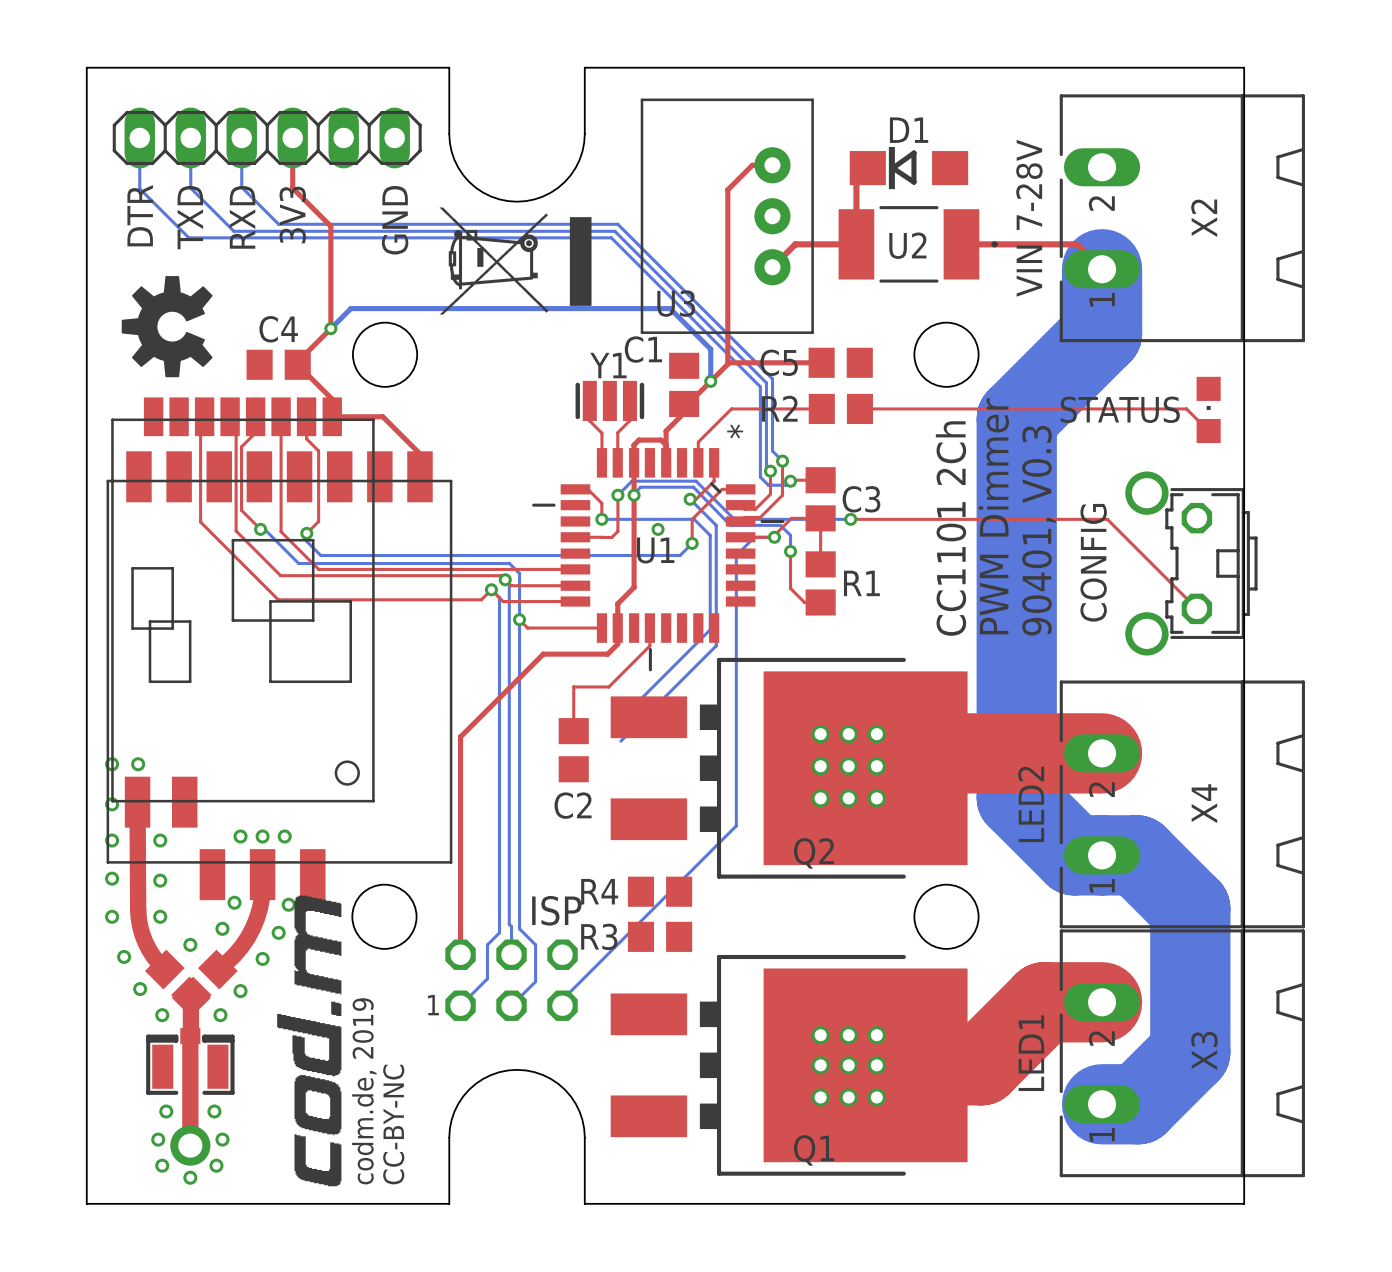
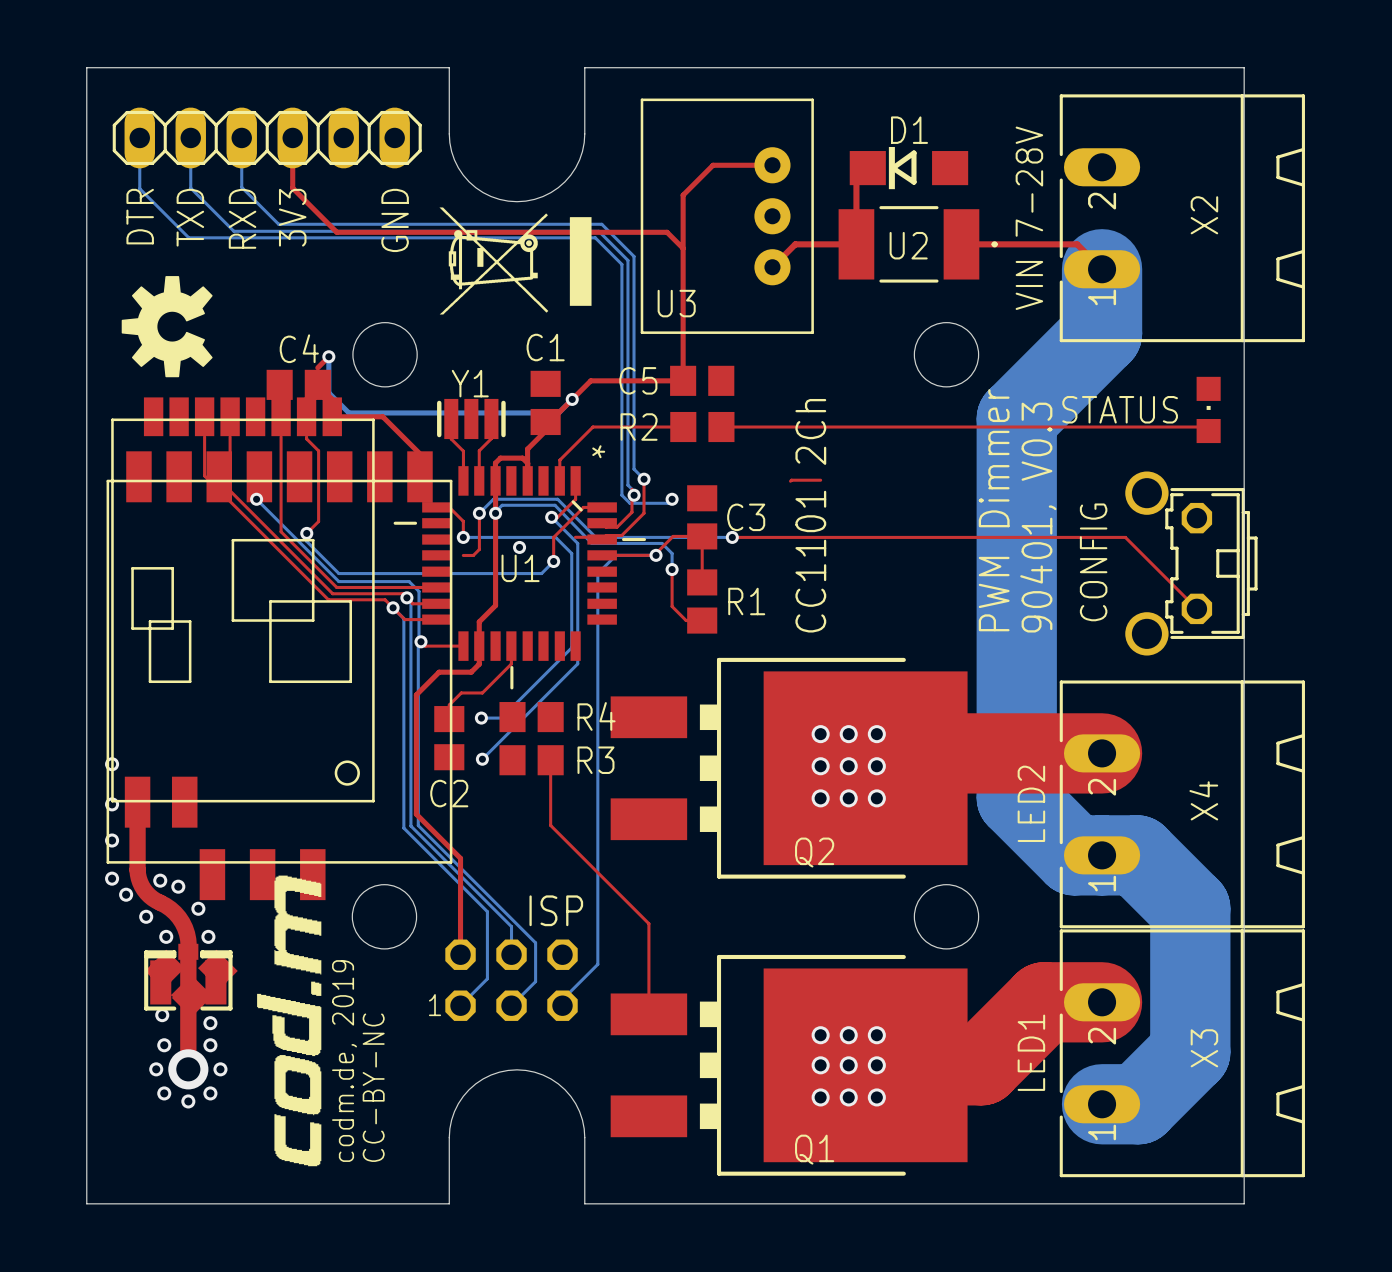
top track: (752, 165) (727, 189) (727, 364) -> (752, 165) (713, 165) (683, 195) (683, 380) (590, 380) (549, 422) (545, 422) (545, 431) (527, 449) (527, 471)
bottom track: (601, 224) (617, 224) (772, 378) (772, 451) (782, 461) -> (601, 224) (634, 256) (634, 469) (644, 479)
top track: (330, 226) (330, 328) (297, 361) (297, 364) (317, 384) -> (330, 226) (336, 232) (667, 232) (683, 248)
bottom track: (598, 231) (614, 231) (766, 382) (766, 467) (770, 471) -> (598, 231) (627, 260) (627, 485) (631, 489)
bottom track: (595, 237) (611, 237) (760, 386) (760, 477) (768, 485) (786, 485) (790, 481) -> (595, 237) (621, 264) (621, 495) (629, 503) (668, 503) (672, 499)
bottom track: (330, 328) (350, 308) (670, 308) (710, 349) (710, 381) -> none
via position: (330, 328) -> (328, 356)
C1 name position: C1 (643, 349) -> C1 (545, 347)
top track: none -> (328, 356) (317, 367)
bottom track: none -> (328, 356) (328, 392) (348, 412) (558, 412) (572, 399)
top track: (821, 362) (729, 362) (688, 403) (684, 403) (684, 412) (666, 431) (666, 452) -> none
C5 position: (840, 362) -> (702, 380)
C4 position: (278, 364) -> (298, 384)
via: (710, 381) -> none
C1 position: (684, 384) -> (545, 402)
via: none -> (572, 399)
top track: (589, 400) (589, 420) (601, 433) (601, 462) -> (451, 418) (451, 439) (463, 451) (463, 480)
Y1 position: (609, 400) -> (471, 418)
top track: (629, 400) (629, 420) (617, 432) (617, 462) -> (491, 418) (491, 438) (479, 450) (479, 480)
top track: (821, 408) (731, 408) (698, 442) (698, 462) -> (683, 427) (592, 427) (559, 460) (559, 480)
R2 position: (840, 408) -> (702, 427)
top track: (859, 408) (1186, 408) (1204, 427) -> (721, 427) (1204, 427)
top track: (204, 416) (200, 420) (200, 522) (278, 599) (328, 599) -> (204, 436) (204, 475) (328, 599)
top track: (230, 416) (236, 422) (236, 531) (280, 575) (501, 575) (511, 585) (575, 585) -> none
top track: (255, 416) (255, 432) (241, 446) (241, 510) (260, 529) -> none
top track: none -> (230, 436) (230, 490) (332, 593) (402, 593) (412, 603) (436, 603)
top track: (782, 461) (782, 495) (760, 517) (744, 517) (740, 521) -> (643, 479) (643, 513) (621, 535) (606, 535) (602, 539)
via: (782, 461) -> none
top track: (633, 462) (633, 445) (638, 440) (661, 440) (666, 445) (666, 462) -> (495, 480) (495, 463) (500, 458) (522, 458) (527, 463) (527, 480)
top track: (634, 462) (634, 587) (617, 603) (617, 644) (607, 654) (543, 654) (460, 736) (460, 858) -> (495, 480) (495, 605) (479, 621) (479, 664) (471, 672) (439, 672) (416, 694) (416, 814) (460, 858)
top track: (714, 462) (714, 481) (696, 499) (690, 499) -> (575, 480) (575, 499) (557, 517) (551, 517)
top track: (770, 471) (770, 494) (755, 509) (744, 509) (740, 505) -> (631, 489) (631, 512) (617, 527) (606, 527) (602, 523)
via: (770, 471) -> none
via: none -> (644, 479)
via: (790, 481) -> none
top track: (575, 489) (587, 489) (601, 503) (601, 519) -> (436, 507) (449, 507) (463, 521) (463, 537)
top track: (740, 489) (722, 489) (692, 519) (692, 543) -> (602, 507) (583, 507) (553, 537) (553, 561)
top track: (617, 495) (617, 531) (611, 537) (601, 537) -> (479, 513) (479, 549) (473, 555) (463, 555)
bottom track: (617, 495) (631, 481) (696, 481) (734, 519) (850, 519) -> none
via: (617, 495) -> none
bottom track: (634, 495) (640, 487) (693, 487) (730, 525) (780, 525) (790, 535) (790, 551) -> none
via: none -> (672, 499)
bottom track: (690, 499) (716, 525) (716, 645) (620, 741) -> (551, 517) (577, 543) (577, 663) (482, 759)
via: (690, 499) -> none
C3 position: (820, 499) -> (702, 517)
bottom track: none -> (479, 513) (493, 499) (557, 499) (595, 537) (732, 537)
via: none -> (479, 513)
bottom track: none -> (495, 513) (502, 505) (554, 505) (591, 543) (662, 543) (672, 553) (672, 569)
via: none -> (495, 513)
via: none -> (551, 517)
bottom track: (601, 519) (694, 519) (710, 535) (710, 629) (639, 700) -> none
via: (601, 519) -> none
top track: (850, 519) (1107, 519) (1125, 537) -> (732, 537) (1125, 537)
via: (850, 519) -> none
text position: CC1101 2Ch (951, 528) -> CC1101 2Ch (810, 515)
bottom track: (260, 529) (264, 529) (298, 563) (509, 563) (519, 573) (519, 928) (535, 944) -> (256, 499) (338, 581) (409, 581) (418, 591) (418, 639) (420, 641) (418, 644) (418, 825) (535, 944)
via position: (260, 529) -> (256, 499)
via: (658, 529) -> none
bottom track: none -> (463, 537) (555, 537) (571, 553) (571, 647) (501, 718) (481, 718)
via: none -> (463, 537)
via: none -> (732, 537)
top track: (740, 537) (774, 537) (791, 518) (820, 518) (820, 564) -> none
bottom track: (774, 537) (754, 537) (736, 555) (736, 825) (597, 964) -> (656, 555) (616, 555) (597, 573) (597, 964)
via: (774, 537) -> none
bottom track: (692, 543) (680, 555) (320, 555) -> (553, 561) (541, 573) (338, 573) (320, 555)
via: (692, 543) -> none
via: none -> (519, 547)
top track: (790, 551) (790, 588) (804, 602) (820, 602) -> (672, 569) (672, 606) (686, 620) (702, 620)
via: (790, 551) -> none
top track: none -> (602, 555) (656, 555) (673, 536) (702, 536) (702, 582)
via: none -> (656, 555)
U1 position: (658, 559) -> (519, 577)
via: none -> (553, 561)
top track: (318, 569) (575, 569) -> (318, 569) (336, 587) (436, 587)
via: none -> (672, 569)
bottom track: (505, 579) (509, 583) (509, 924) -> (406, 597) (410, 601) (410, 826) (509, 924)
via: (505, 579) -> none
R1 position: (820, 583) -> (702, 601)
bottom track: (491, 589) (499, 597) (499, 932) (487, 944) -> (393, 607) (403, 618) (403, 828) (487, 911) (487, 944)
via: (491, 589) -> none
via: none -> (406, 597)
top track: (385, 599) (481, 599) (491, 589) (503, 601) (575, 601) -> (385, 599) (404, 619) (436, 619)
via: none -> (393, 607)
top track: (519, 619) (527, 628) (601, 628) -> none
via: (519, 619) -> none
top track: (649, 628) (649, 645) (608, 686) (573, 686) (573, 731) -> none
top track: none -> (420, 641) (425, 646) (463, 646)
via: none -> (420, 641)
top track: none -> (511, 646) (511, 664) (482, 692) (461, 692) (449, 705) (449, 719)
via: none -> (481, 718)
C2 position: (573, 750) -> (449, 738)
via: none -> (482, 759)
top track: none -> (550, 760) (550, 825) (648, 923) (648, 1014)
via: (138, 764) -> none
top track: (137, 802) (139, 925) (149, 949) (164, 969) -> none
top track: none -> (137, 822) (137, 869) (140, 882) (149, 895) (175, 912) (182, 922) (187, 933) (188, 945) (188, 1069)
via: (240, 836) -> none
via: (262, 836) -> none
via: (284, 836) -> none
via: (160, 840) -> none
top track: (262, 874) (262, 896) (252, 928) (241, 946) (217, 969) -> none
via: none -> (178, 886)
R4 name position: R4 (599, 891) -> R4 (596, 716)
R4 position: (660, 891) -> (531, 717)
via: none -> (126, 894)
via: (234, 902) -> none
via: (288, 904) -> none
via: none -> (198, 908)
via: (112, 916) -> none
via position: (160, 916) -> (146, 916)
via: (222, 928) -> none
via: (278, 932) -> none
via: none -> (166, 936)
via: none -> (208, 936)
R3 name position: R3 (599, 936) -> R3 (595, 760)
R3 position: (660, 936) -> (531, 760)
via: (190, 944) -> none
via: (124, 956) -> none
via: (262, 958) -> none
via: (140, 989) -> none
via: (240, 991) -> none
top track: (190, 996) (190, 1145) -> none
via position: (220, 1015) -> (210, 1023)
drawing position: (309, 1040) -> (289, 1020)
via: none -> (164, 1045)
via: none -> (210, 1045)
part position: (190, 1061) -> (188, 977)
via: none -> (156, 1069)
via: none -> (220, 1069)
text position: codm.de, 2019 (364, 1091) -> codm.de, 2019 (344, 1061)
via: none -> (164, 1093)
via: none -> (210, 1093)
via: none -> (188, 1101)
via: (166, 1111) -> none
via: (214, 1111) -> none
text position: CC-BY-NC (393, 1124) -> CC-BY-NC (373, 1087)
via: (158, 1139) -> none
via: (222, 1139) -> none
via position: (190, 1145) -> (188, 1069)
via: (162, 1165) -> none
via: (216, 1165) -> none
via: (190, 1177) -> none

